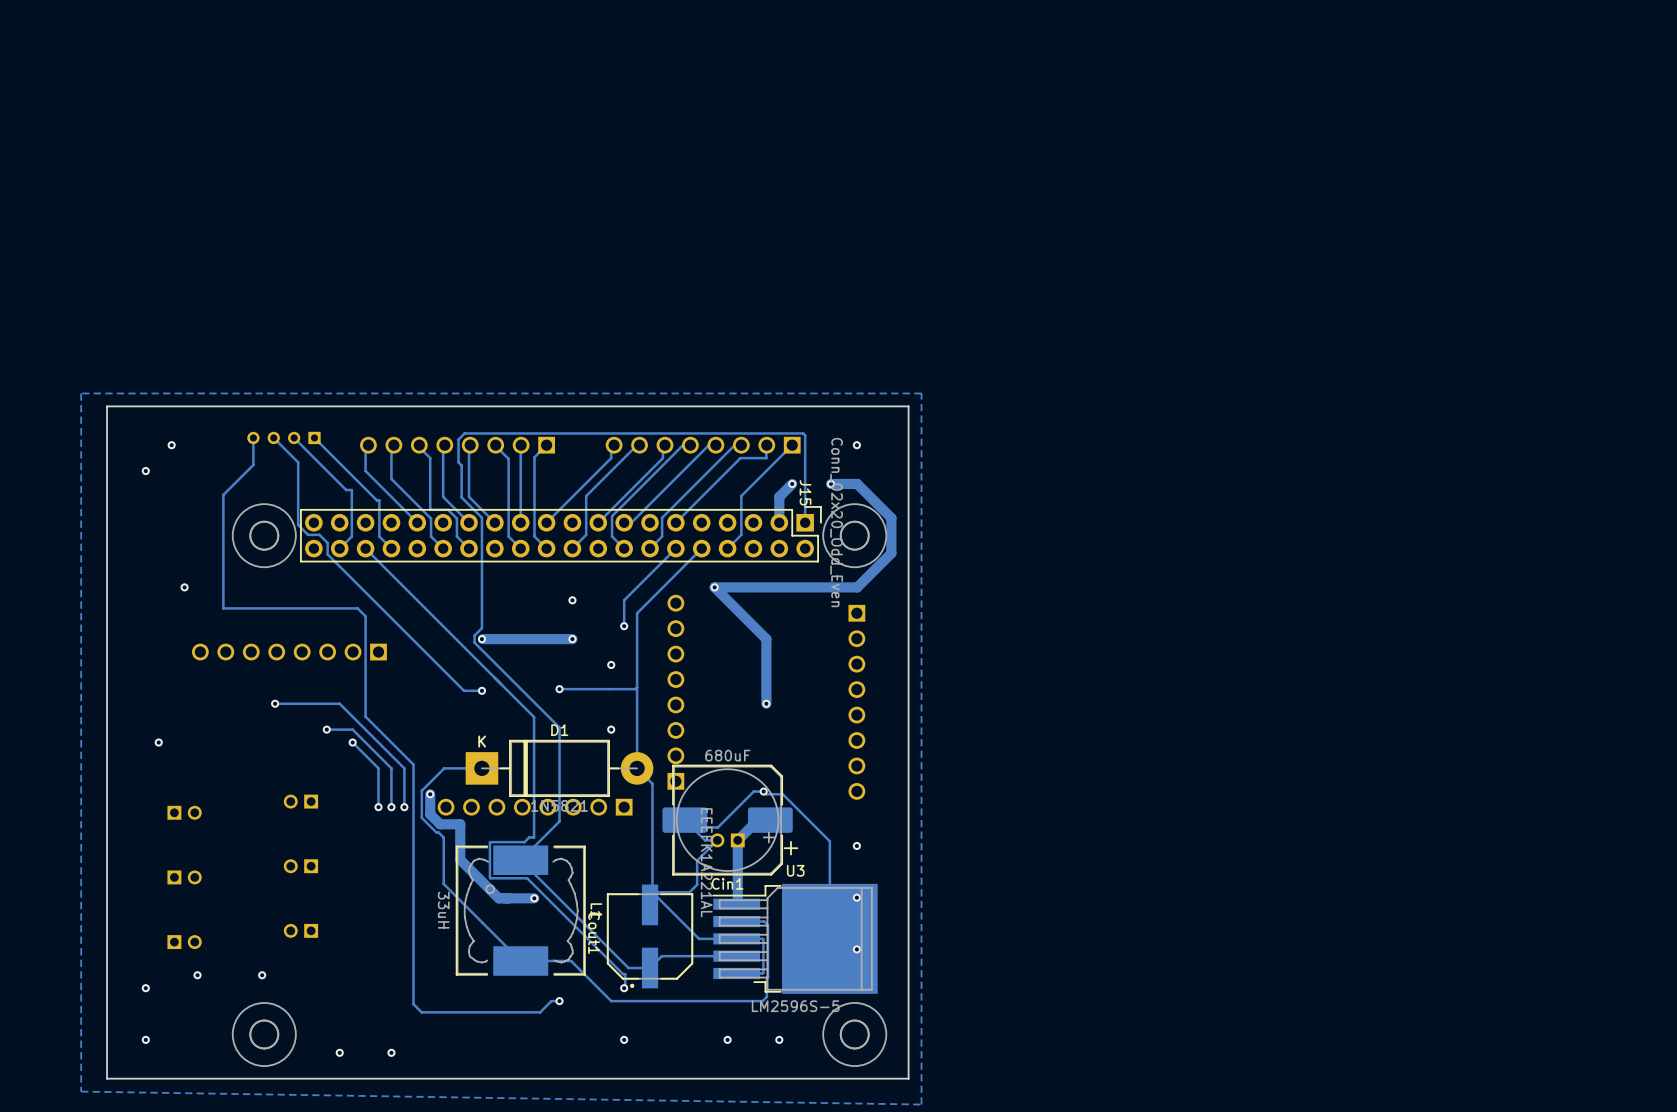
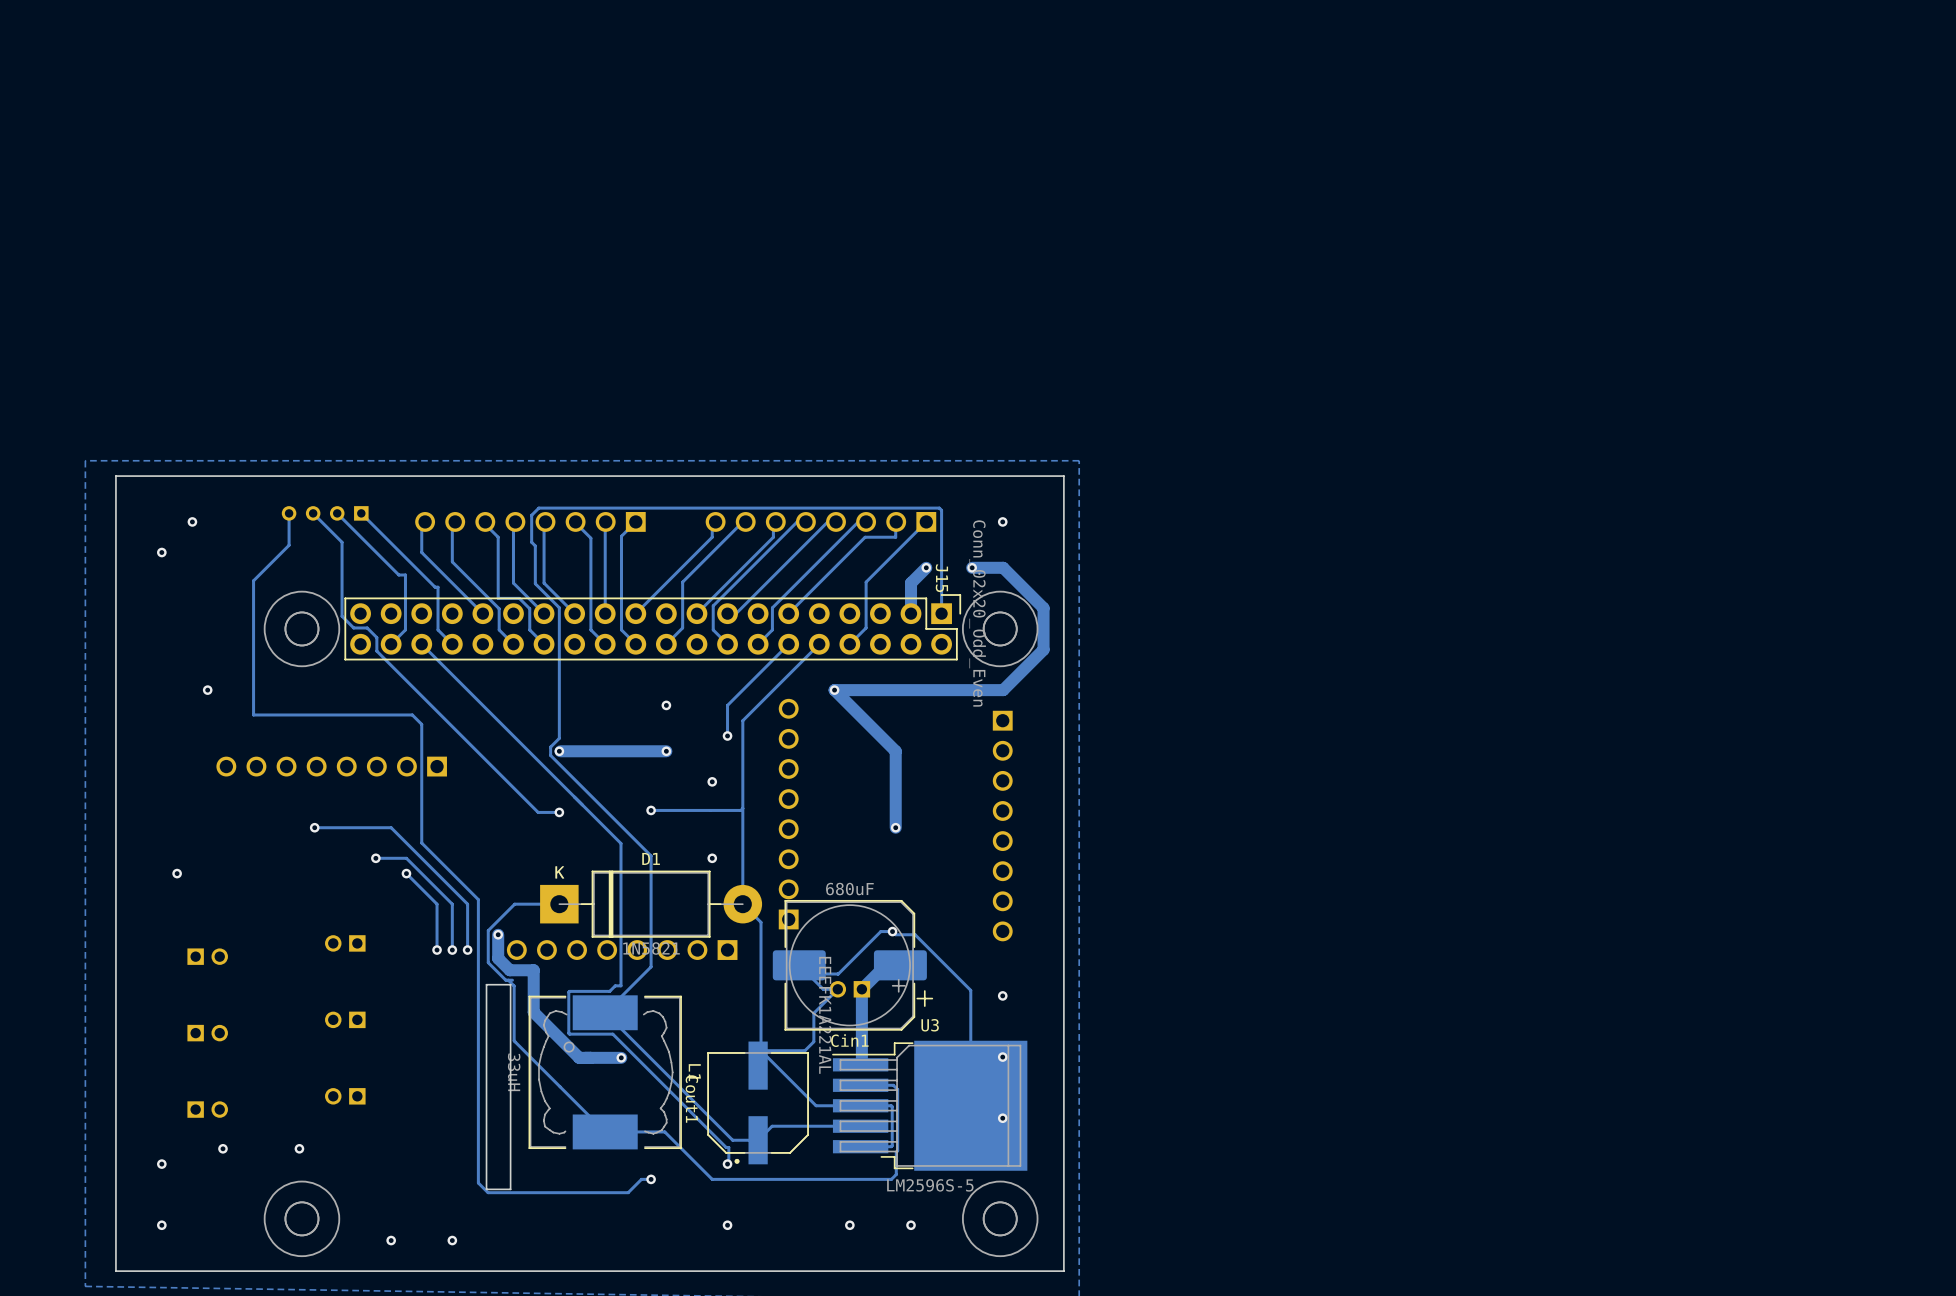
board edge: none -> (510, 984) (486, 984) (486, 1189) (510, 1189) (510, 984)

